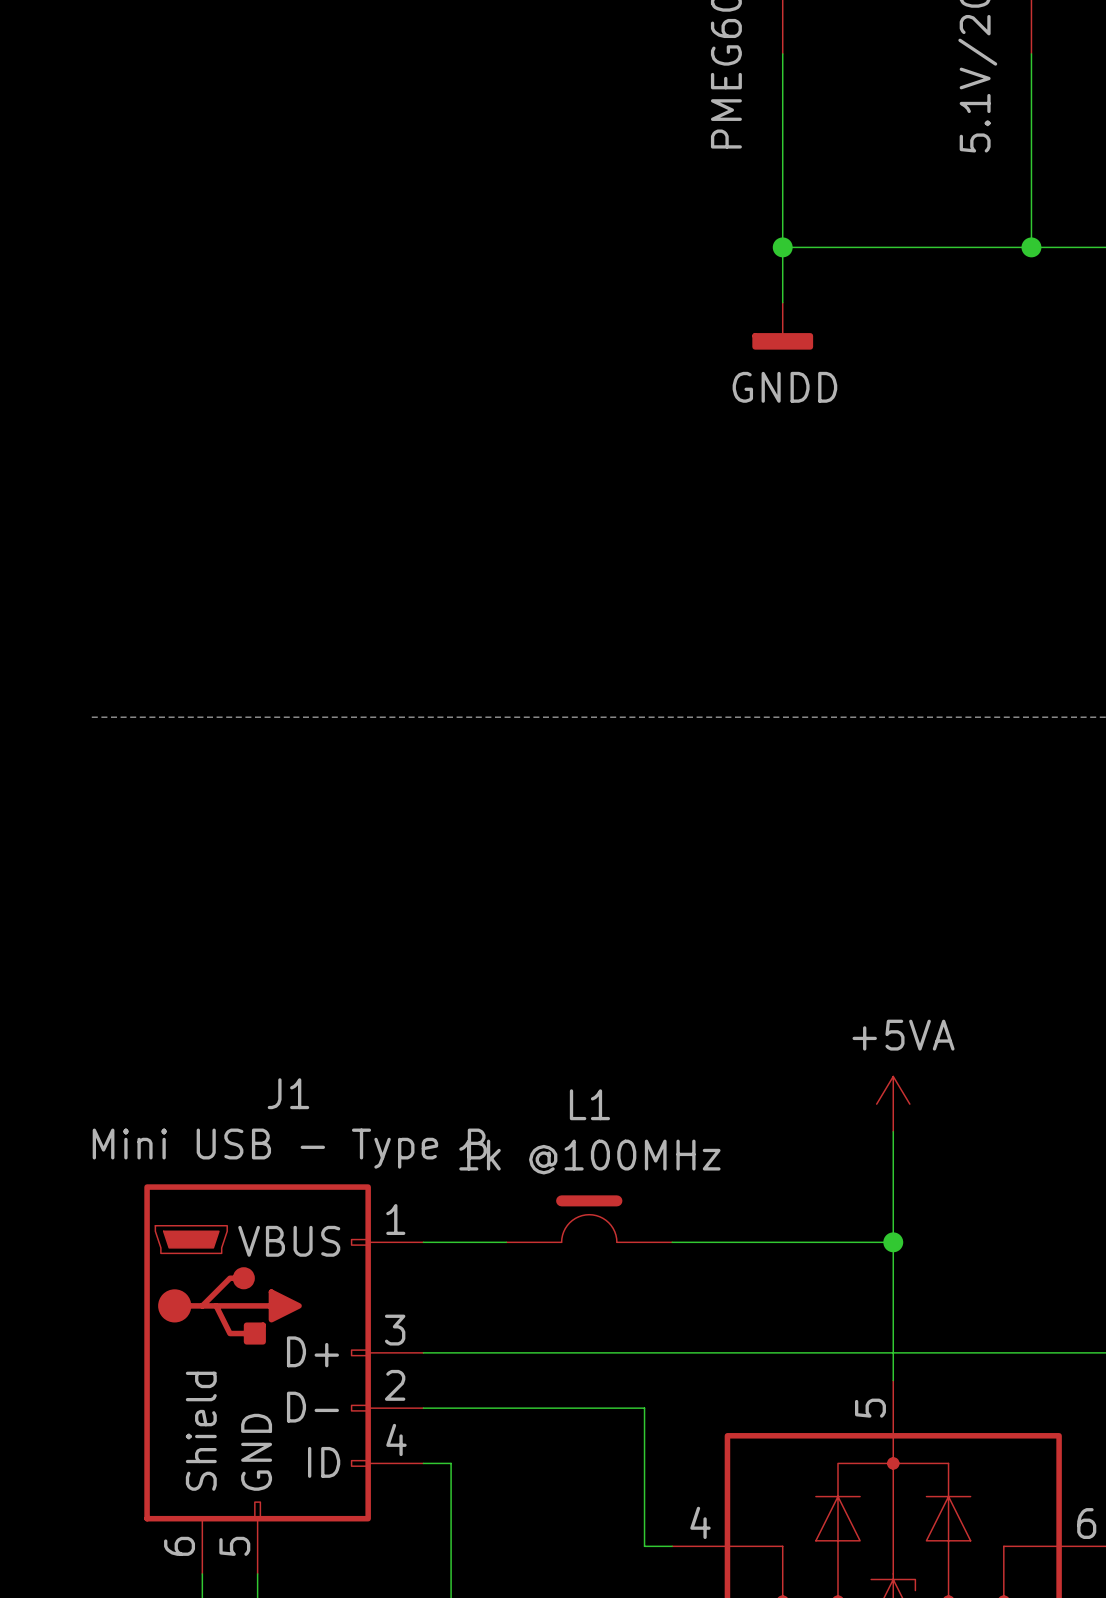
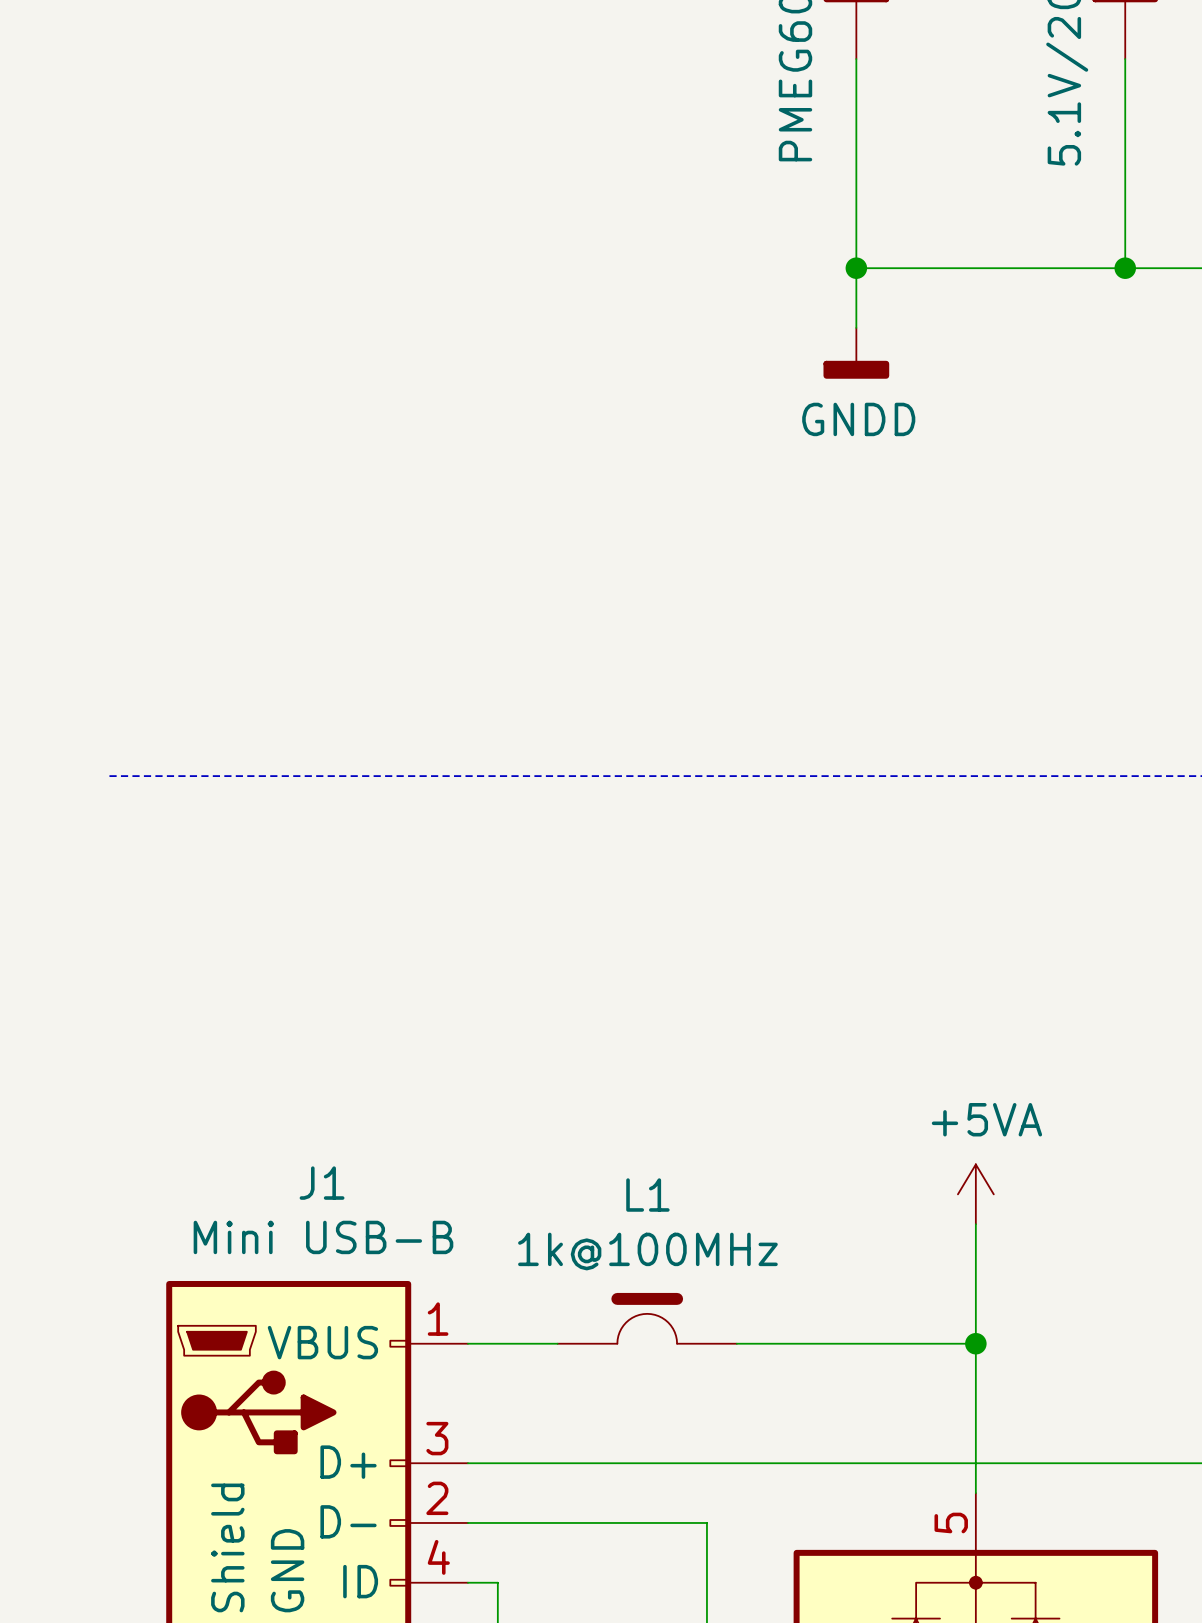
J1 value: Mini USB - Type B (289, 1148) -> Mini USB-B (323, 1237)
L1 value: 1k @100MHz (589, 1157) -> 1k@100MHz (647, 1251)

